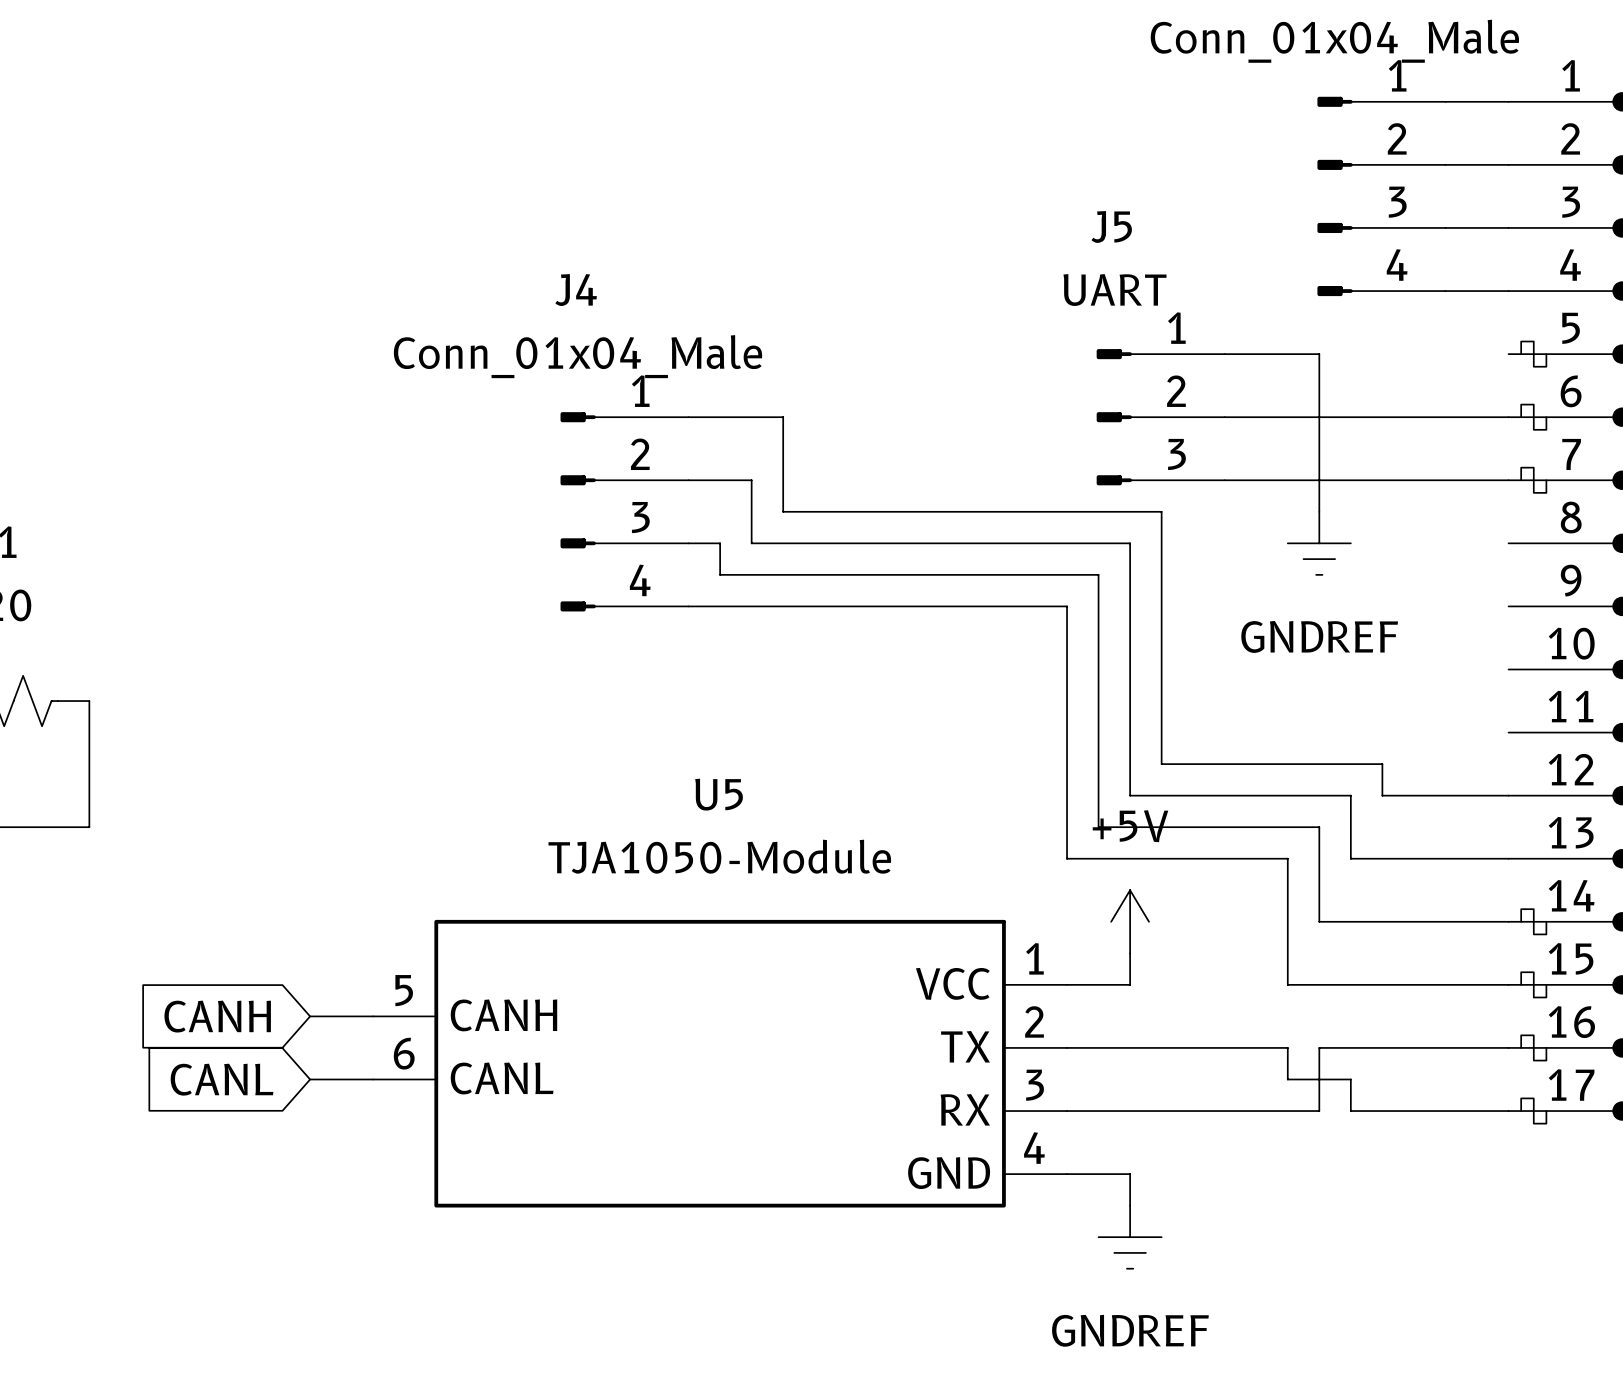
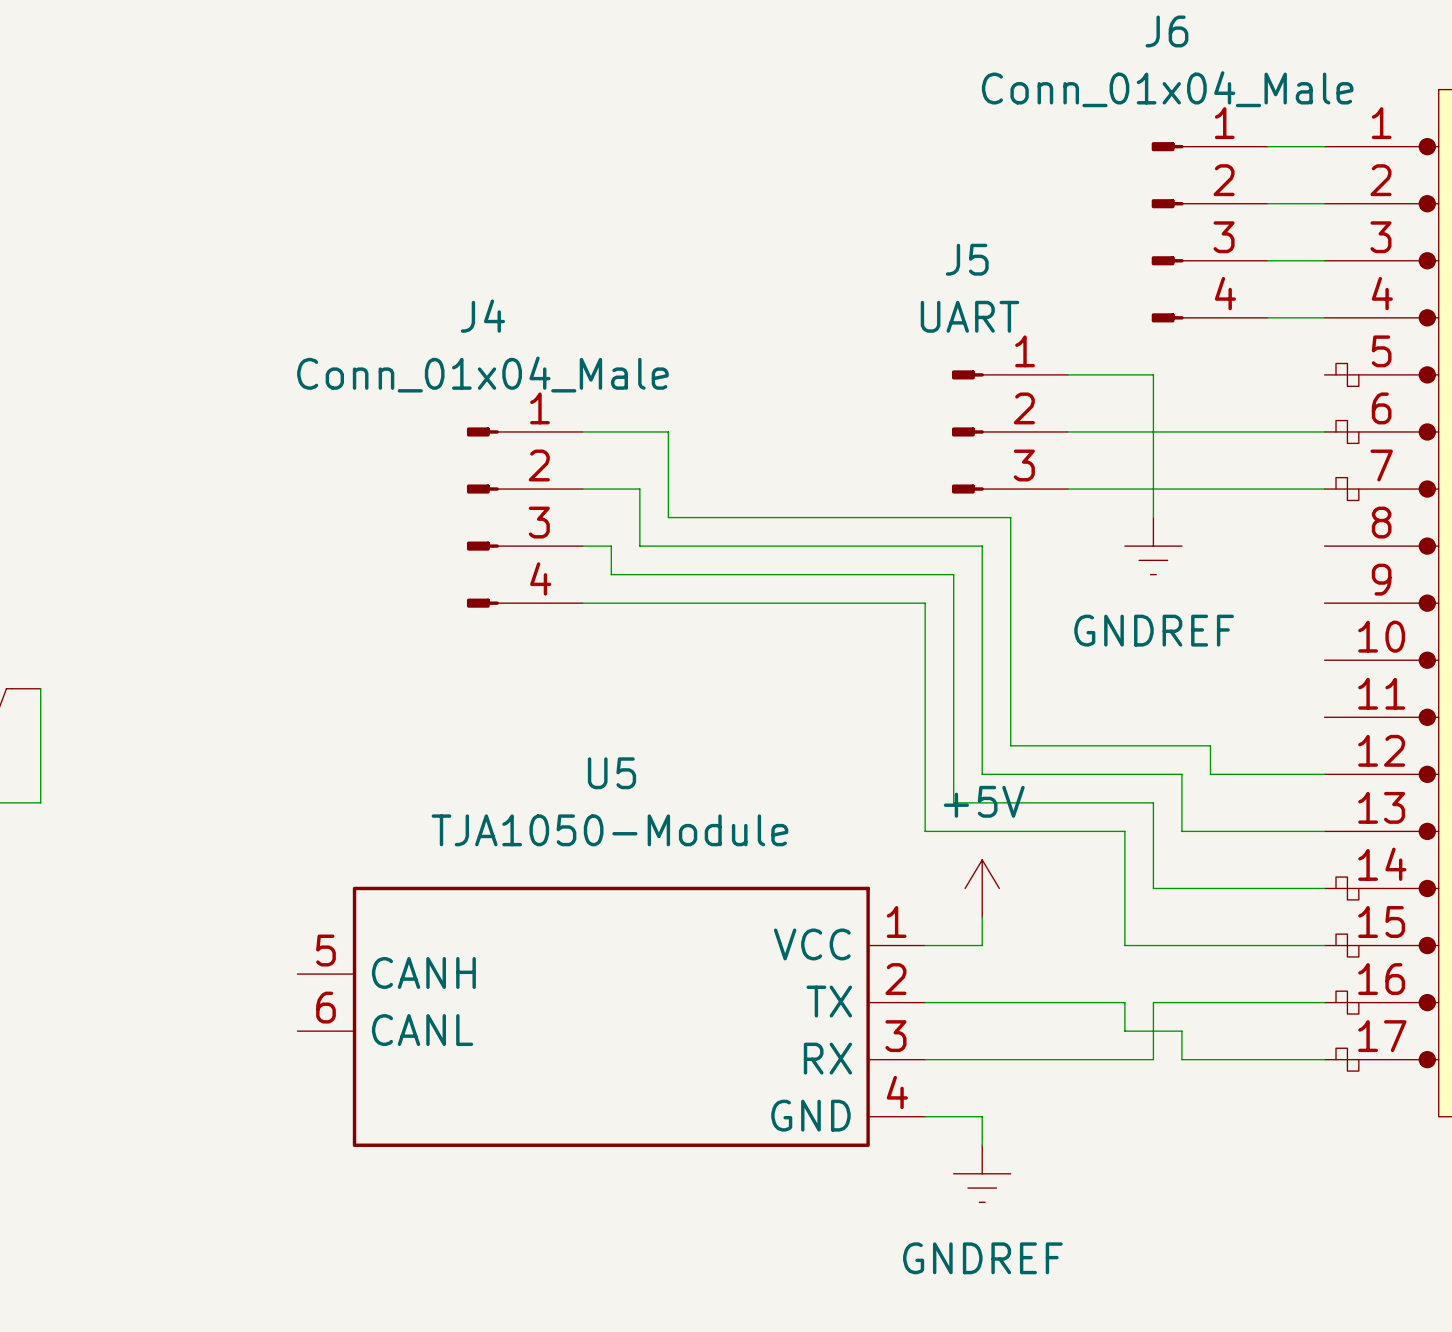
global label: CANH (217, 1016) -> none
wire: (310, 1016) (373, 1016) -> none
global label: CANL (222, 1079) -> none
wire: (310, 1079) (373, 1079) -> none

